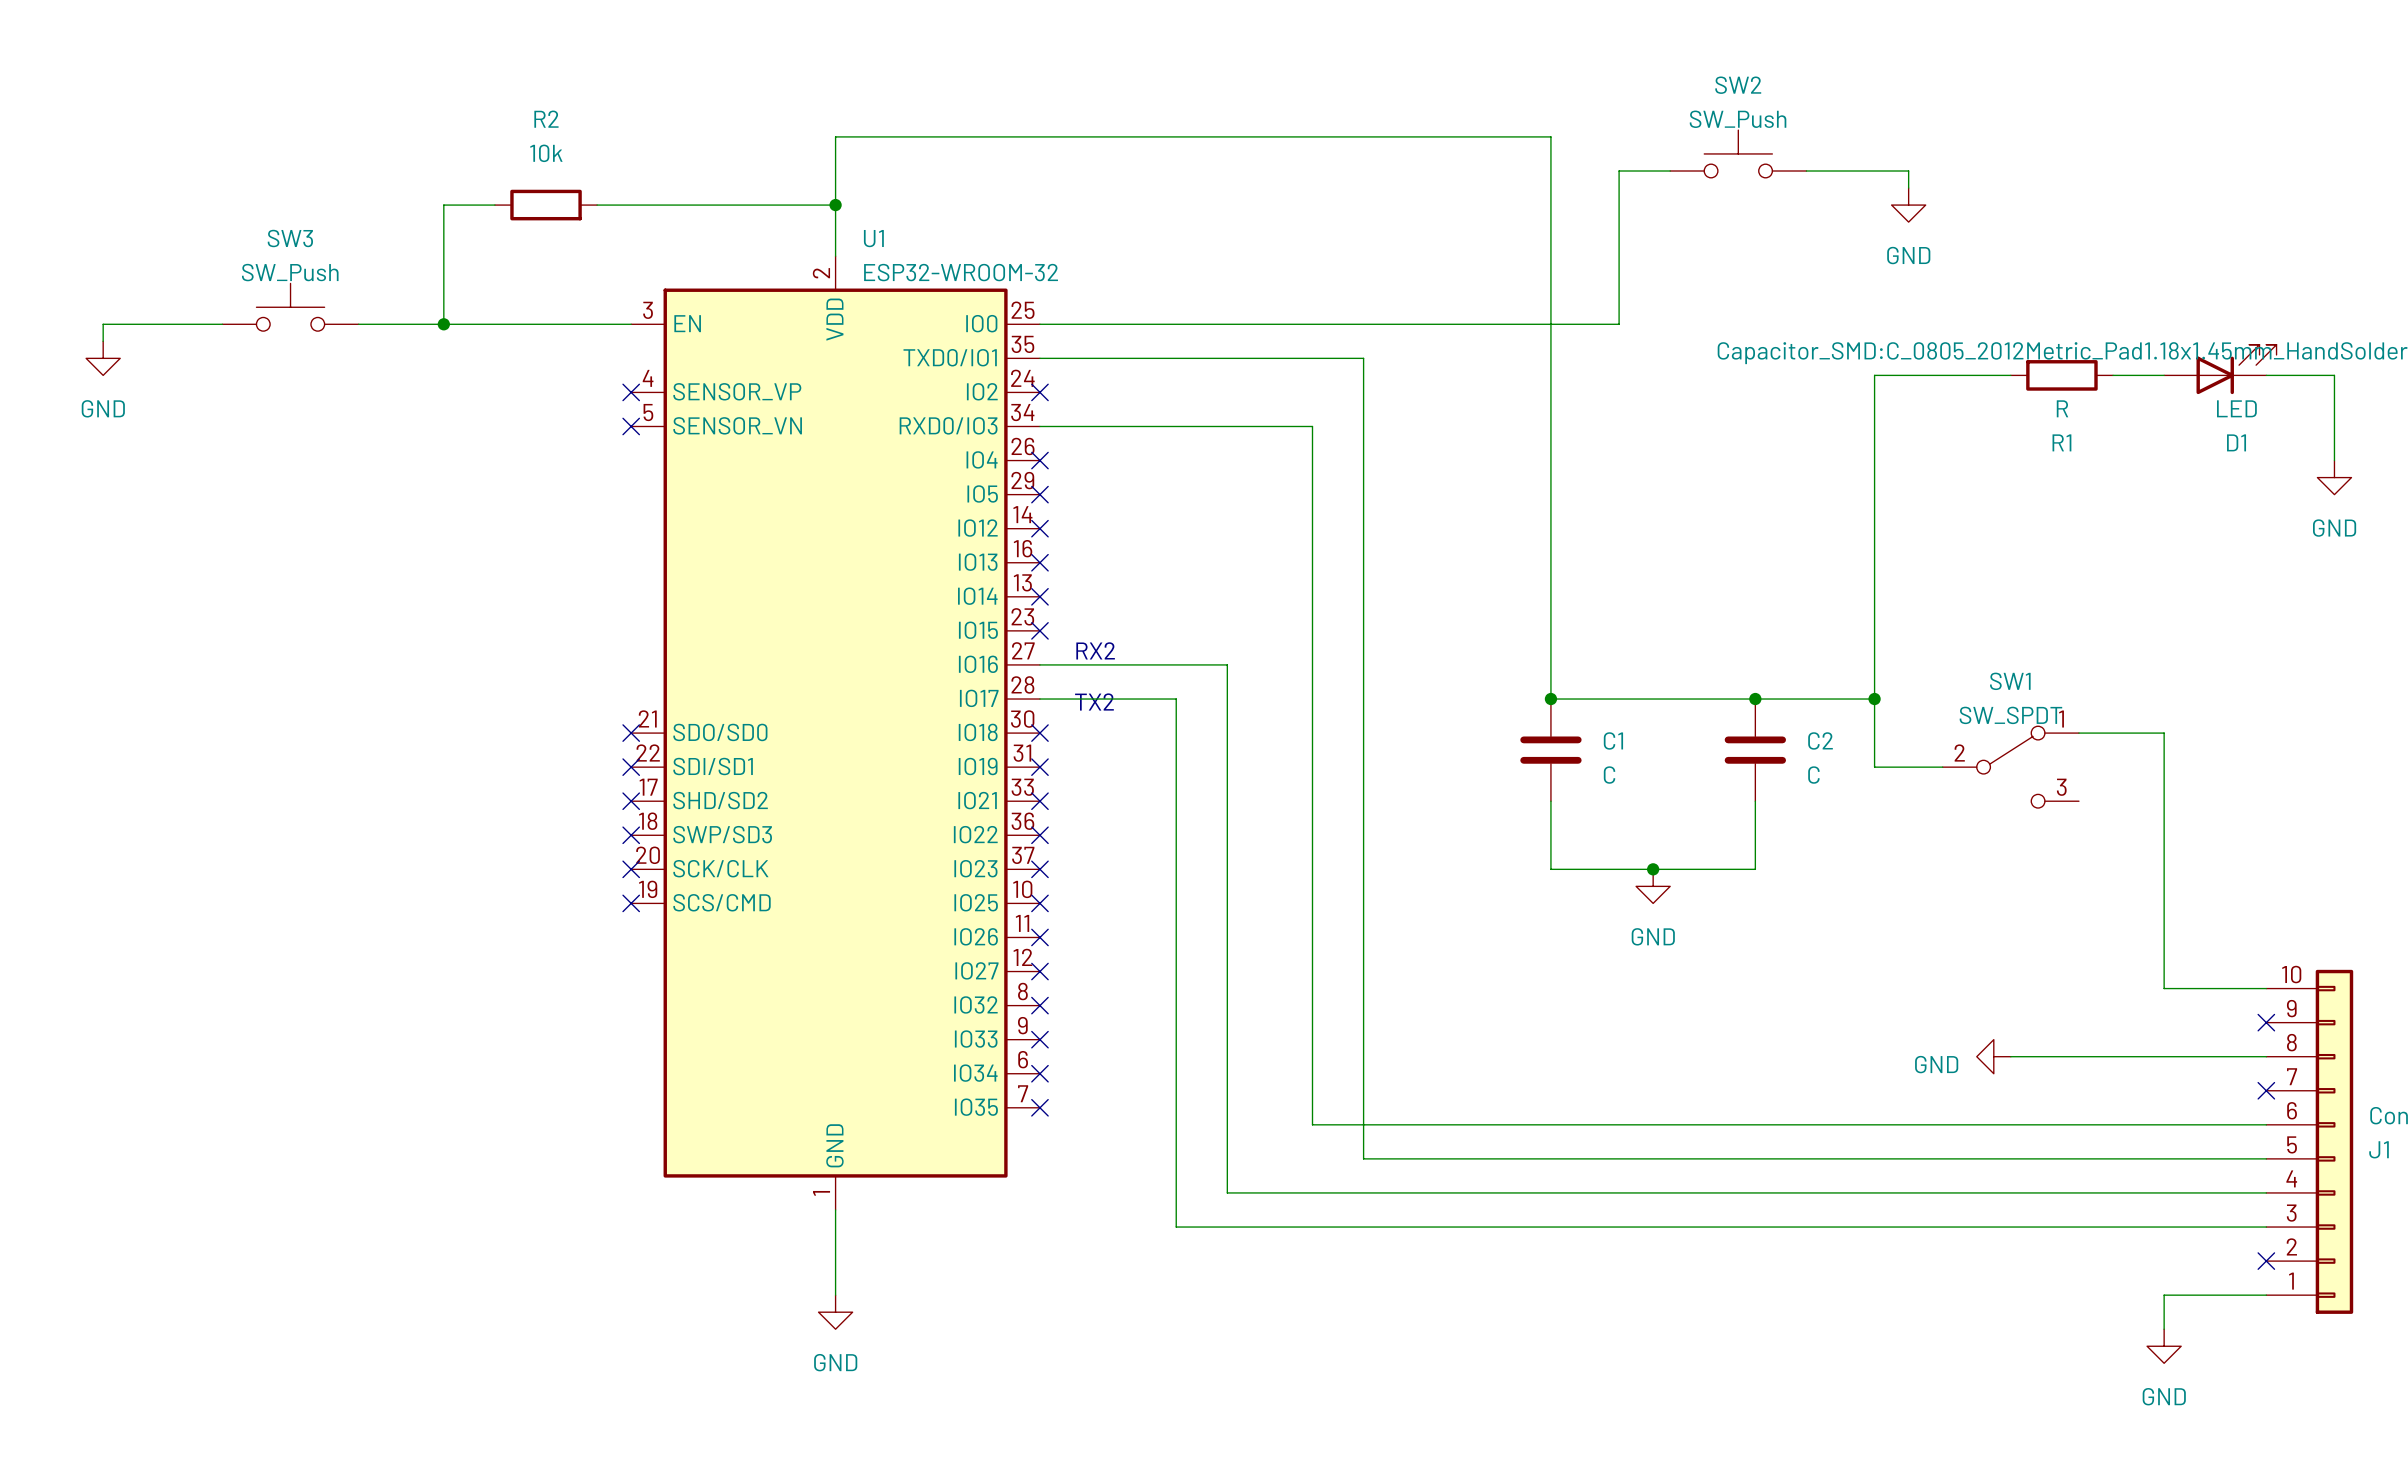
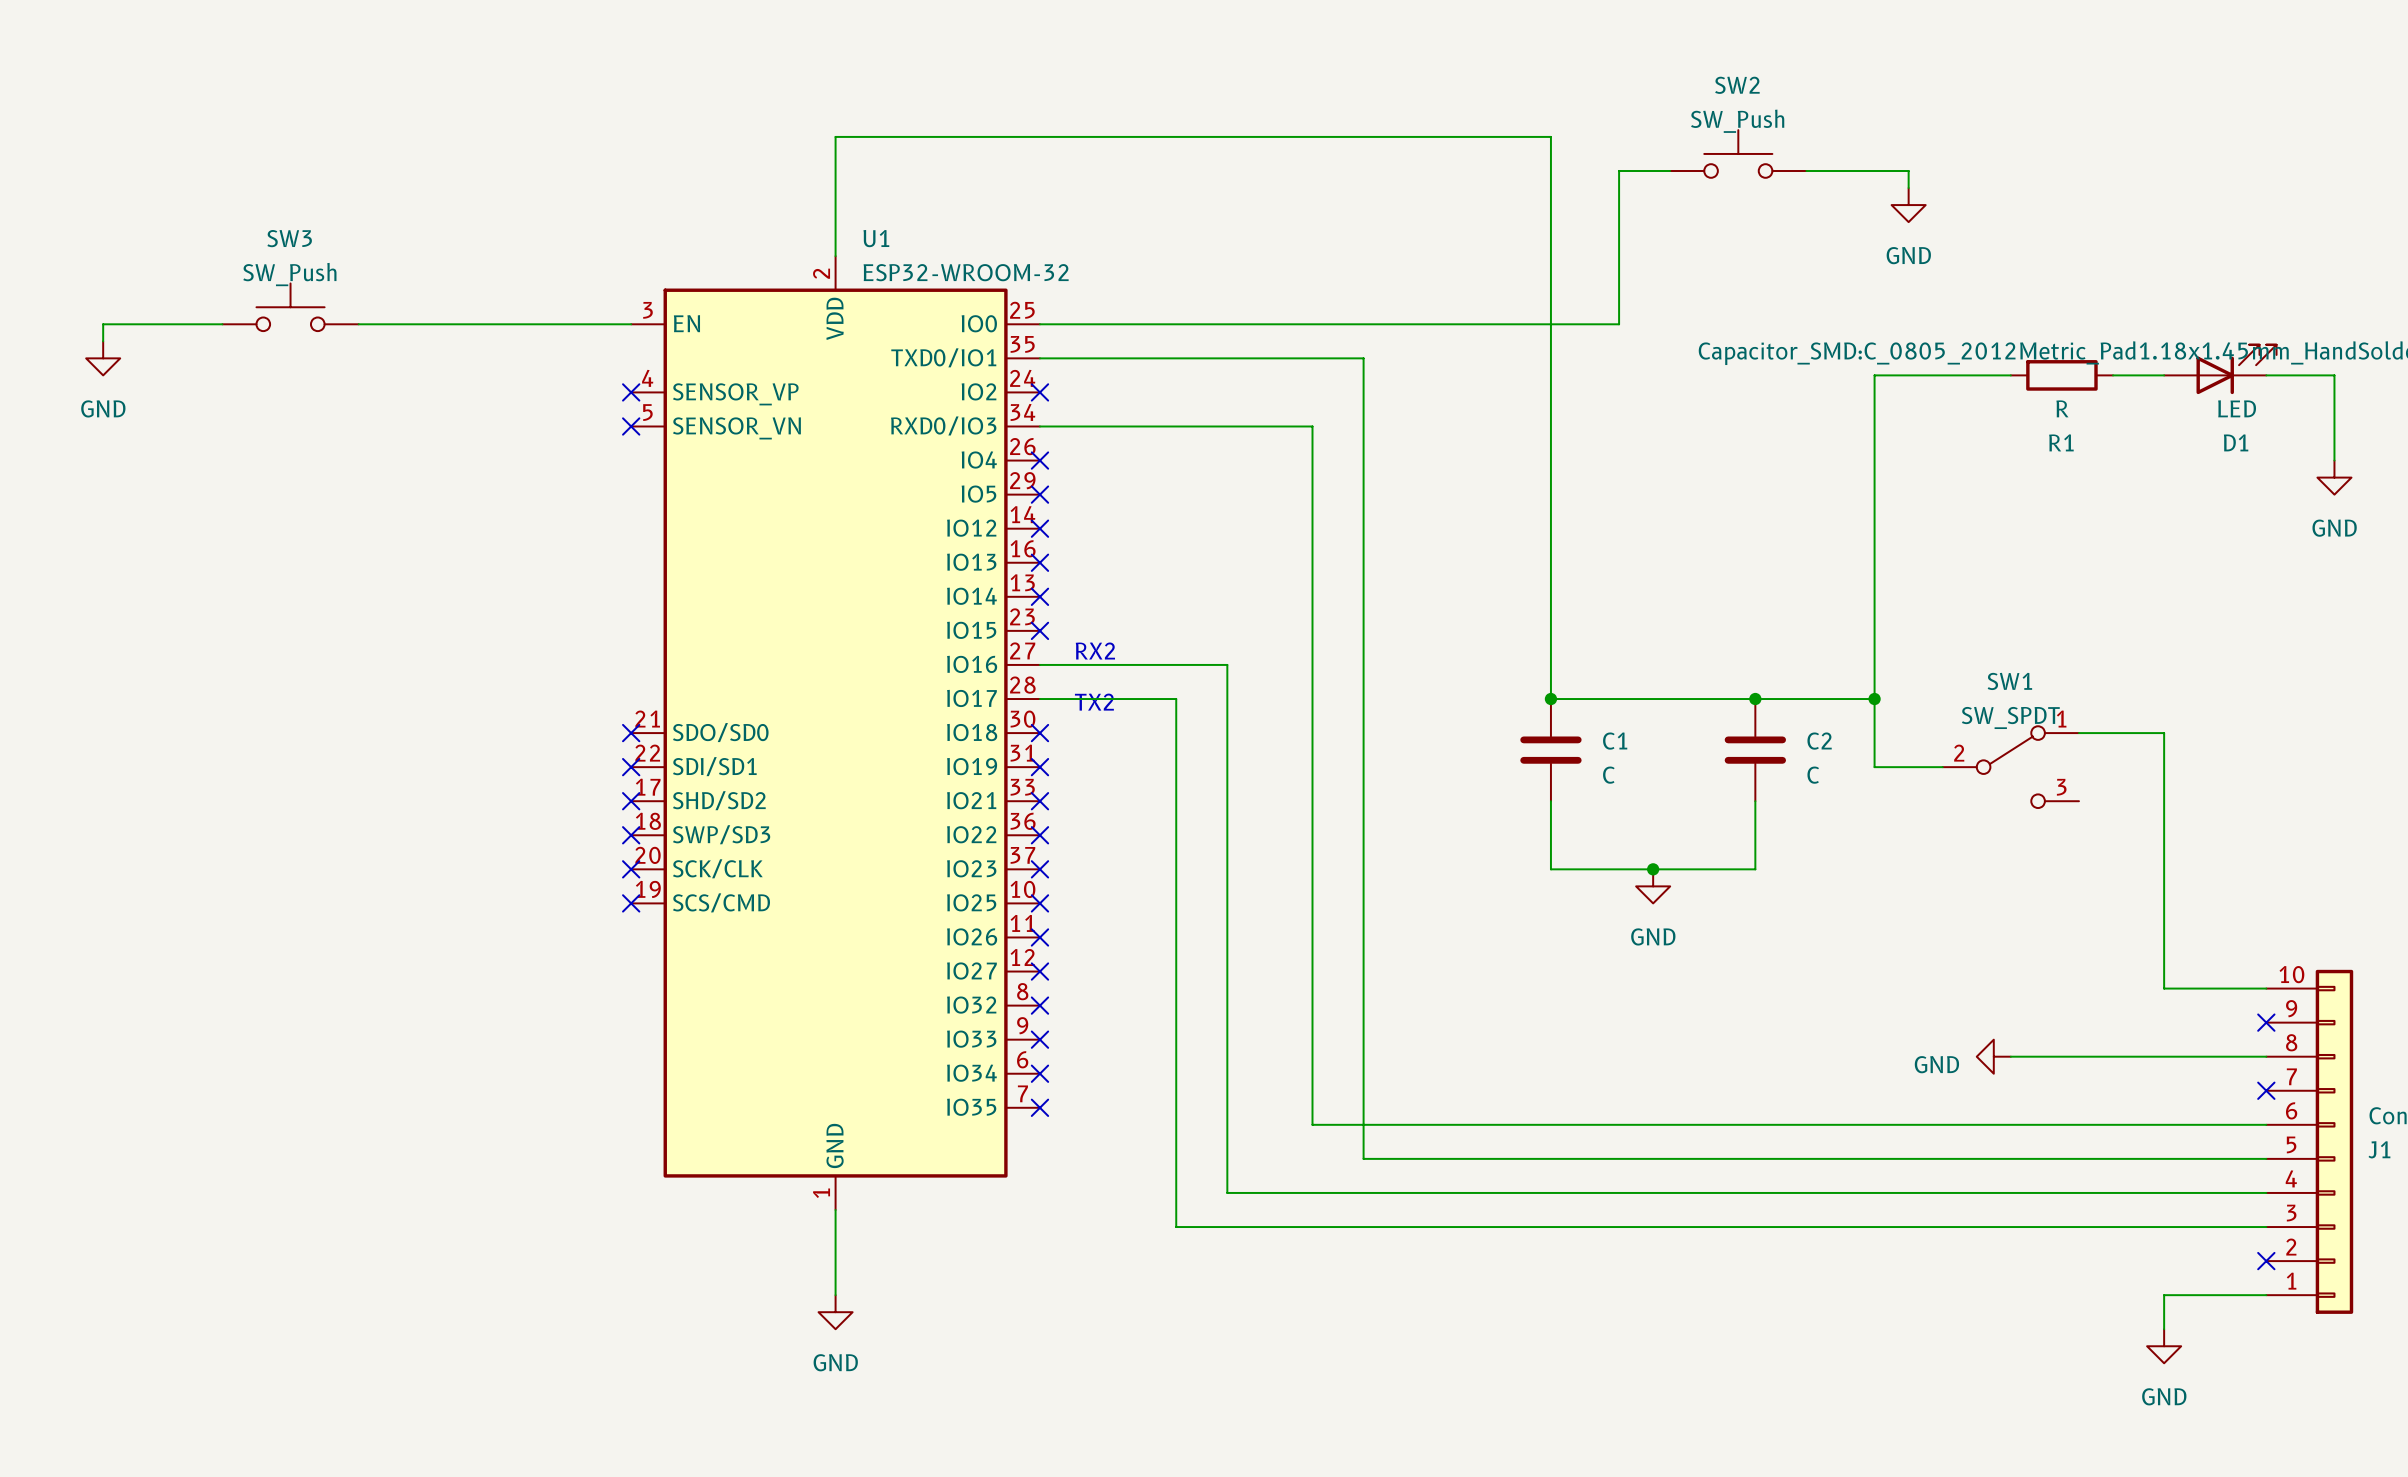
wire: (494, 205) (443, 205) (443, 324) -> none
R2: 10k (546, 205) -> none
wire: (597, 205) (835, 205) -> none
junction: (835, 205) -> none
junction: (443, 324) -> none

